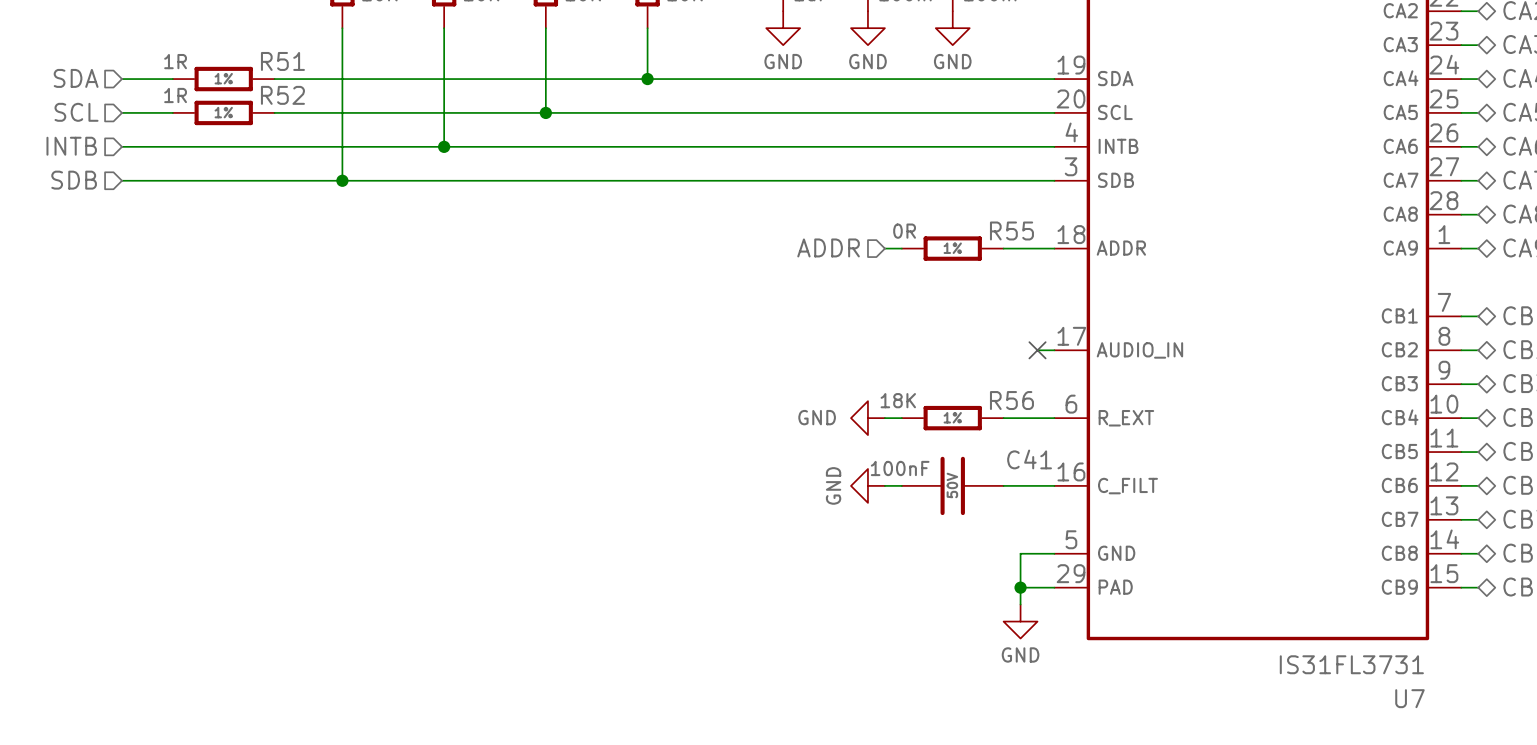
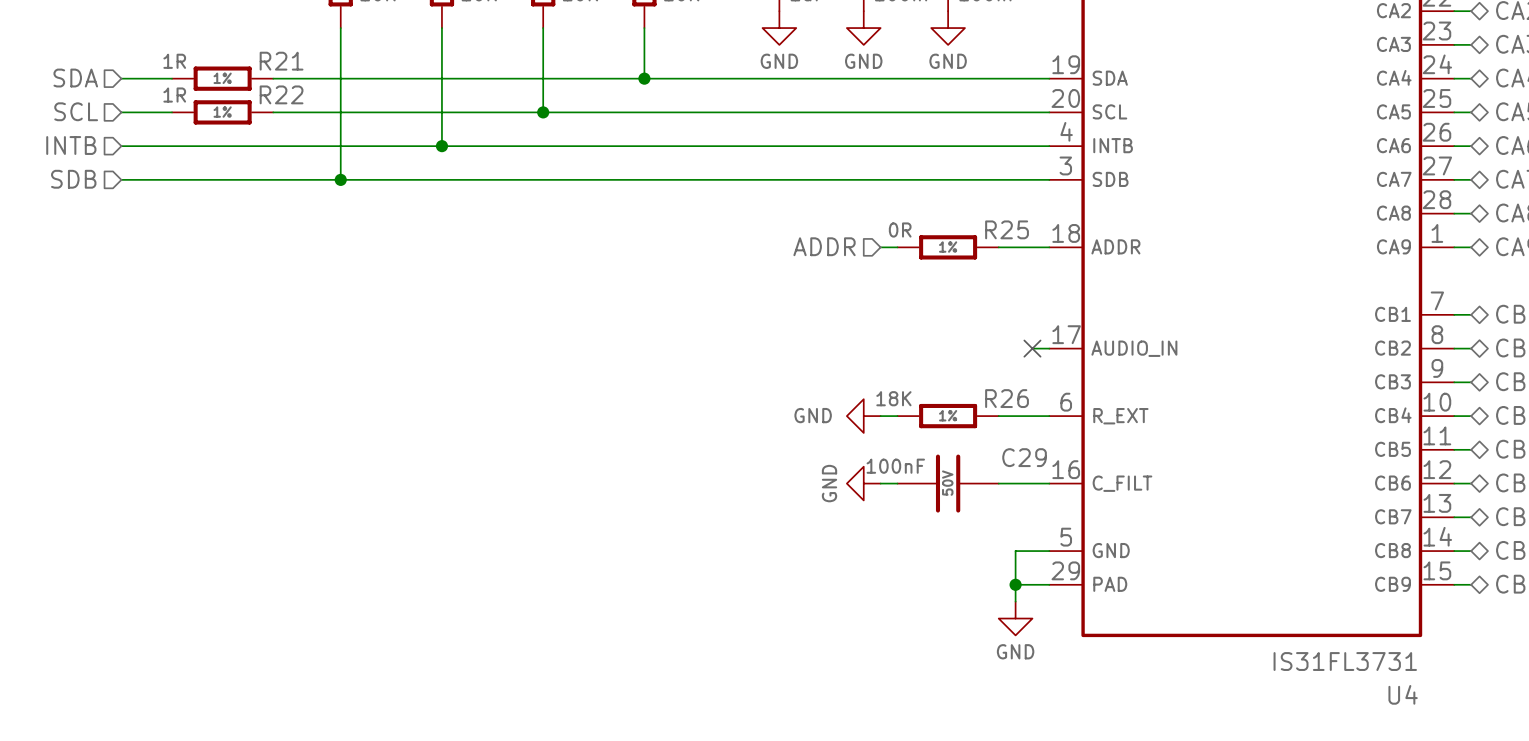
R51 name: R51 (282, 61) -> R21 (281, 61)
R52 name: R52 (282, 95) -> R22 (281, 94)
R55 name: R55 (1011, 230) -> R25 (1007, 229)
R56 name: R56 (1011, 400) -> R26 (1007, 398)
C41 name: C41 (1029, 459) -> C29 (1024, 457)
U7 name: U7 (1409, 698) -> U4 (1403, 694)

